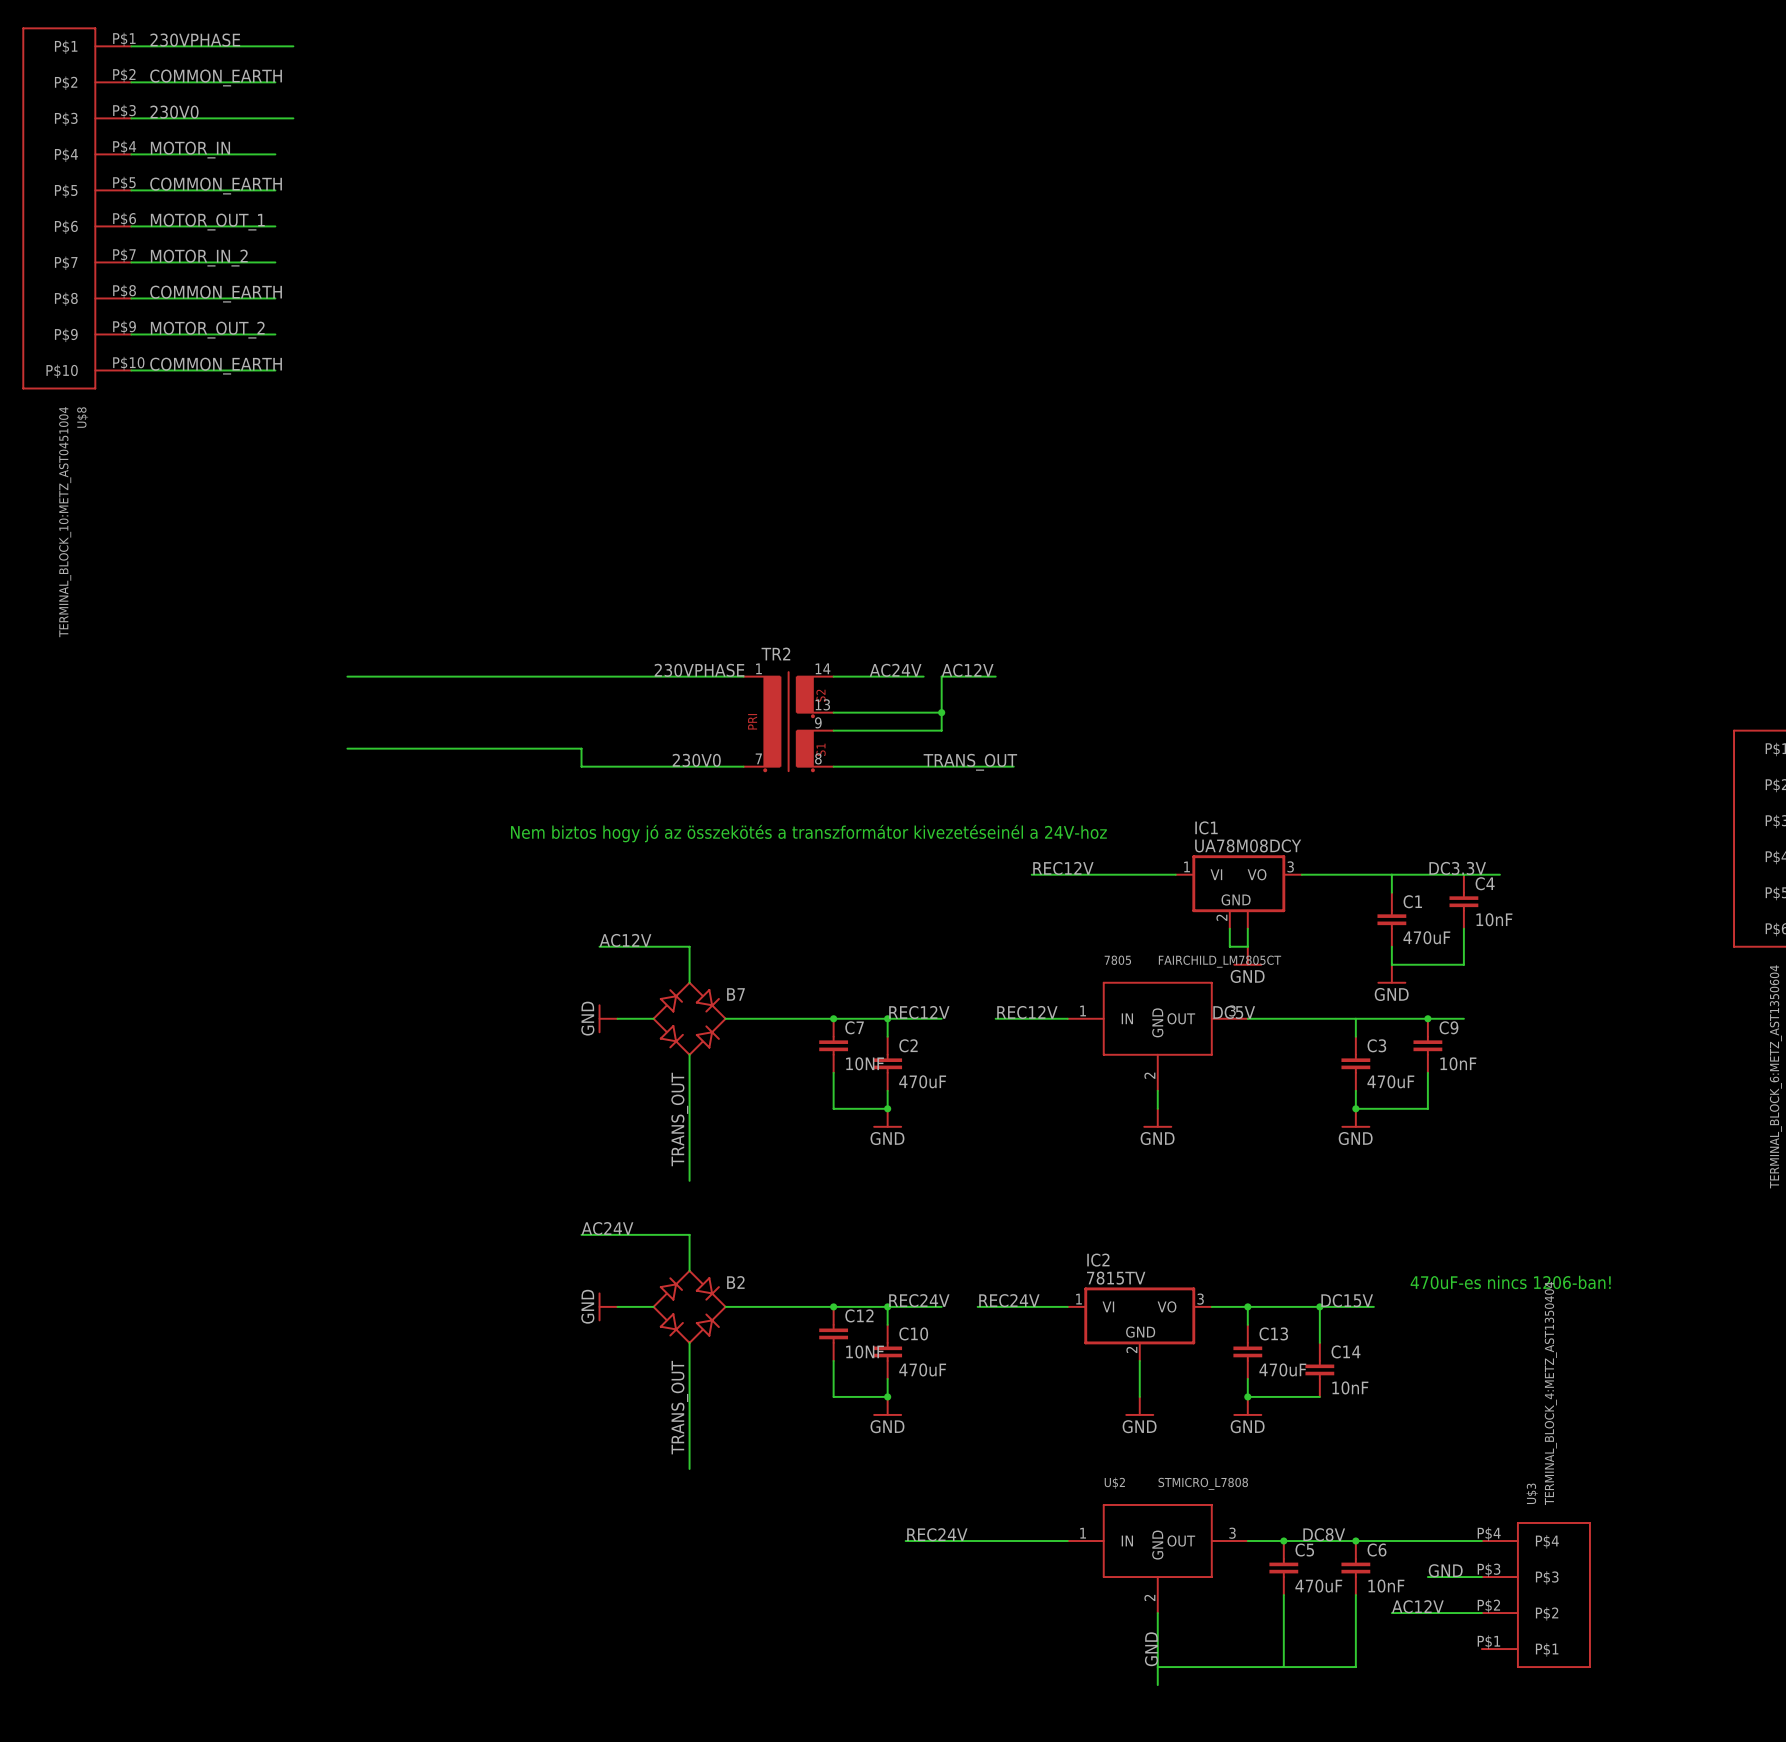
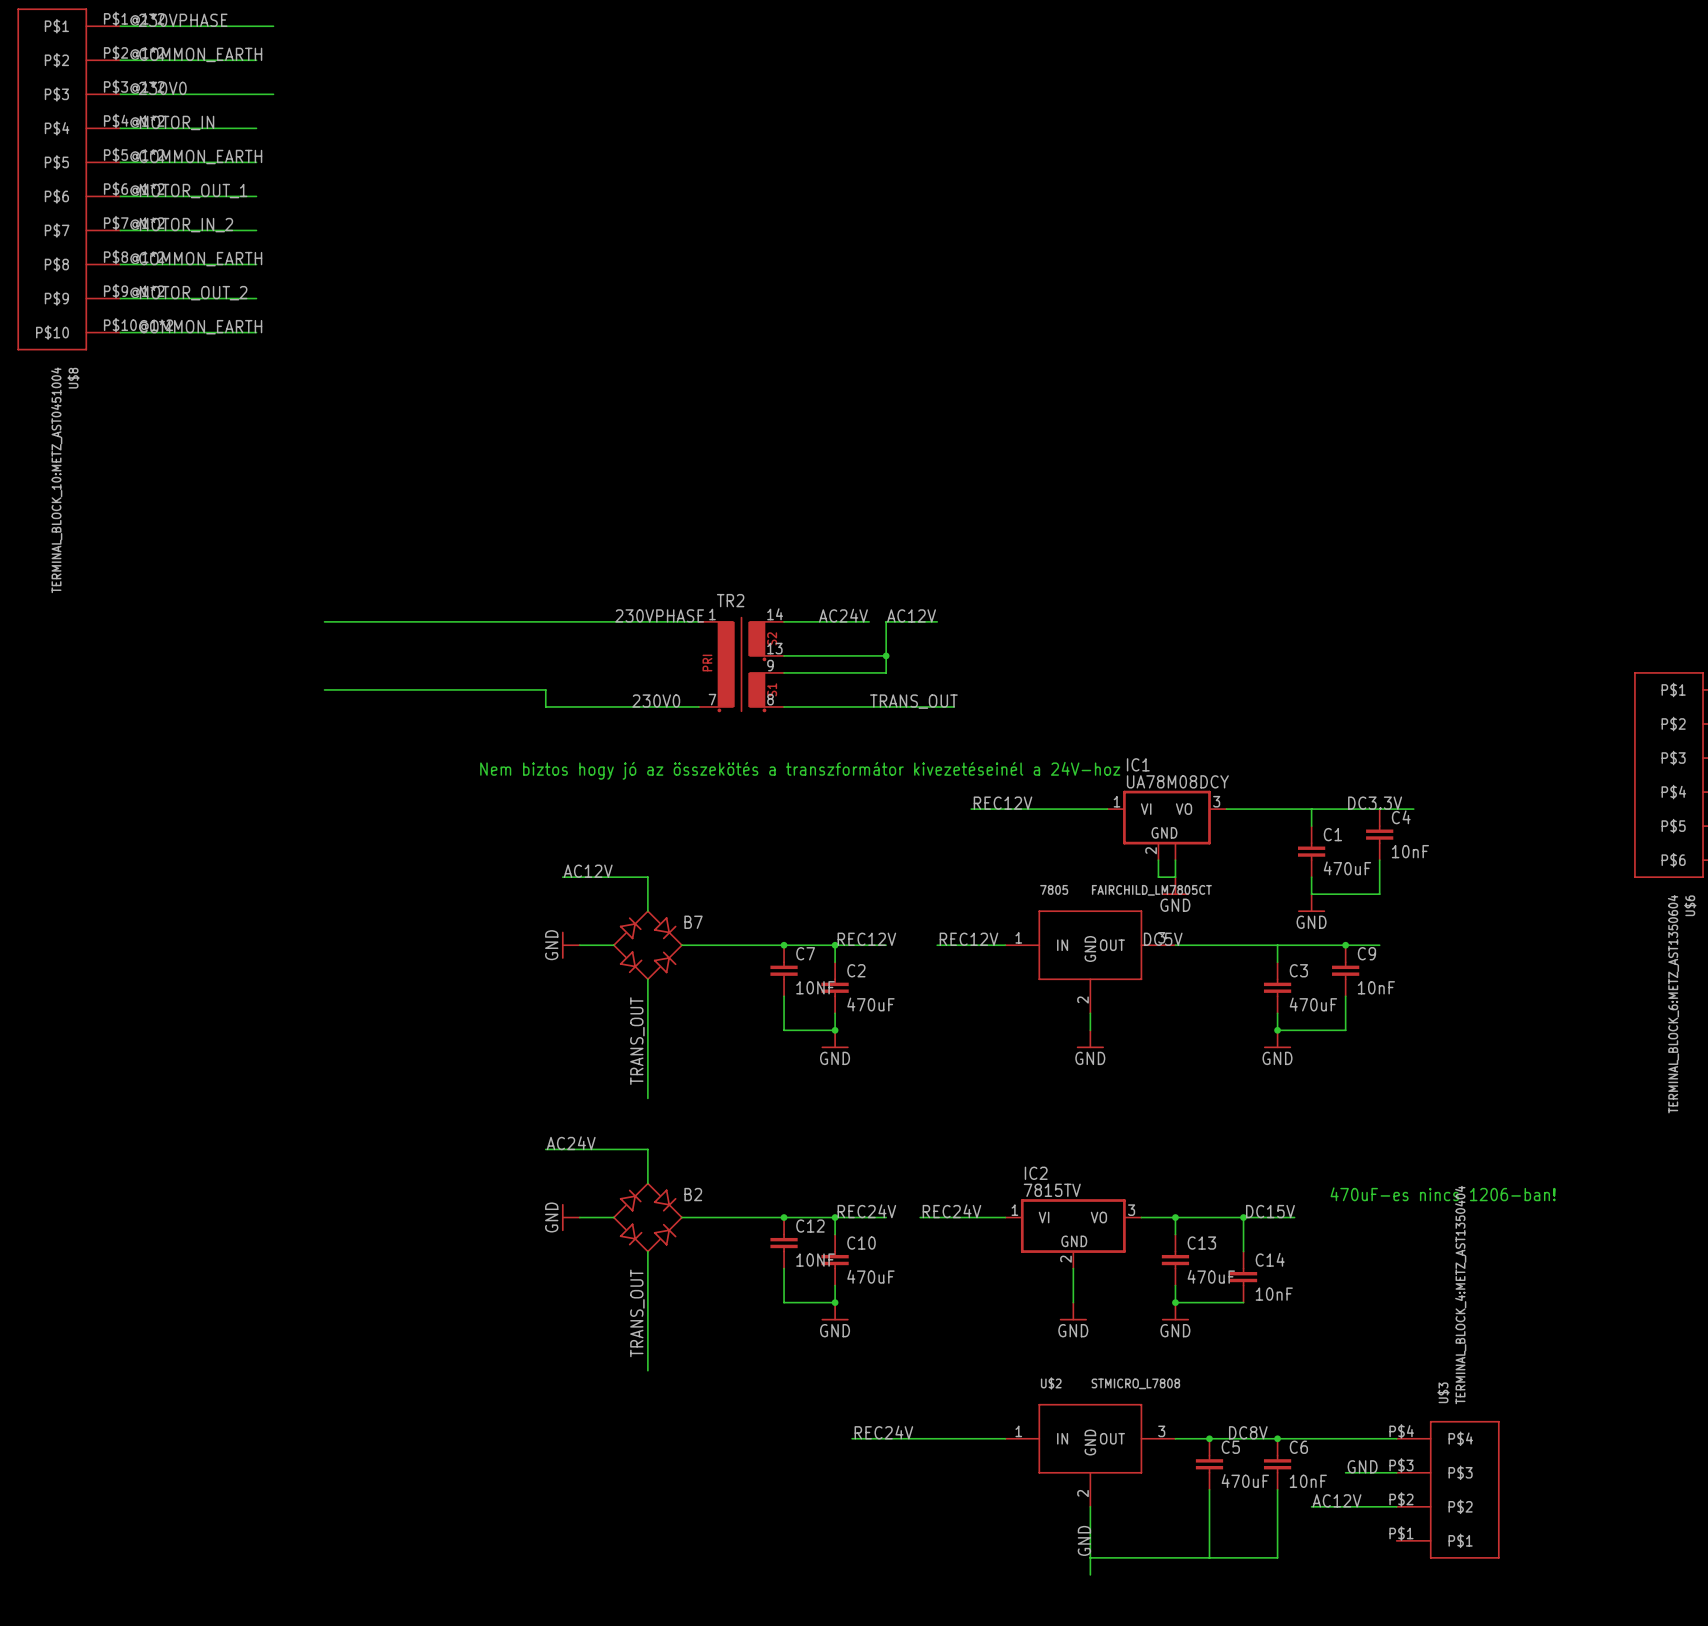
U$8 symbol: [22, 27, 132, 390] -> [17, 8, 121, 351]

